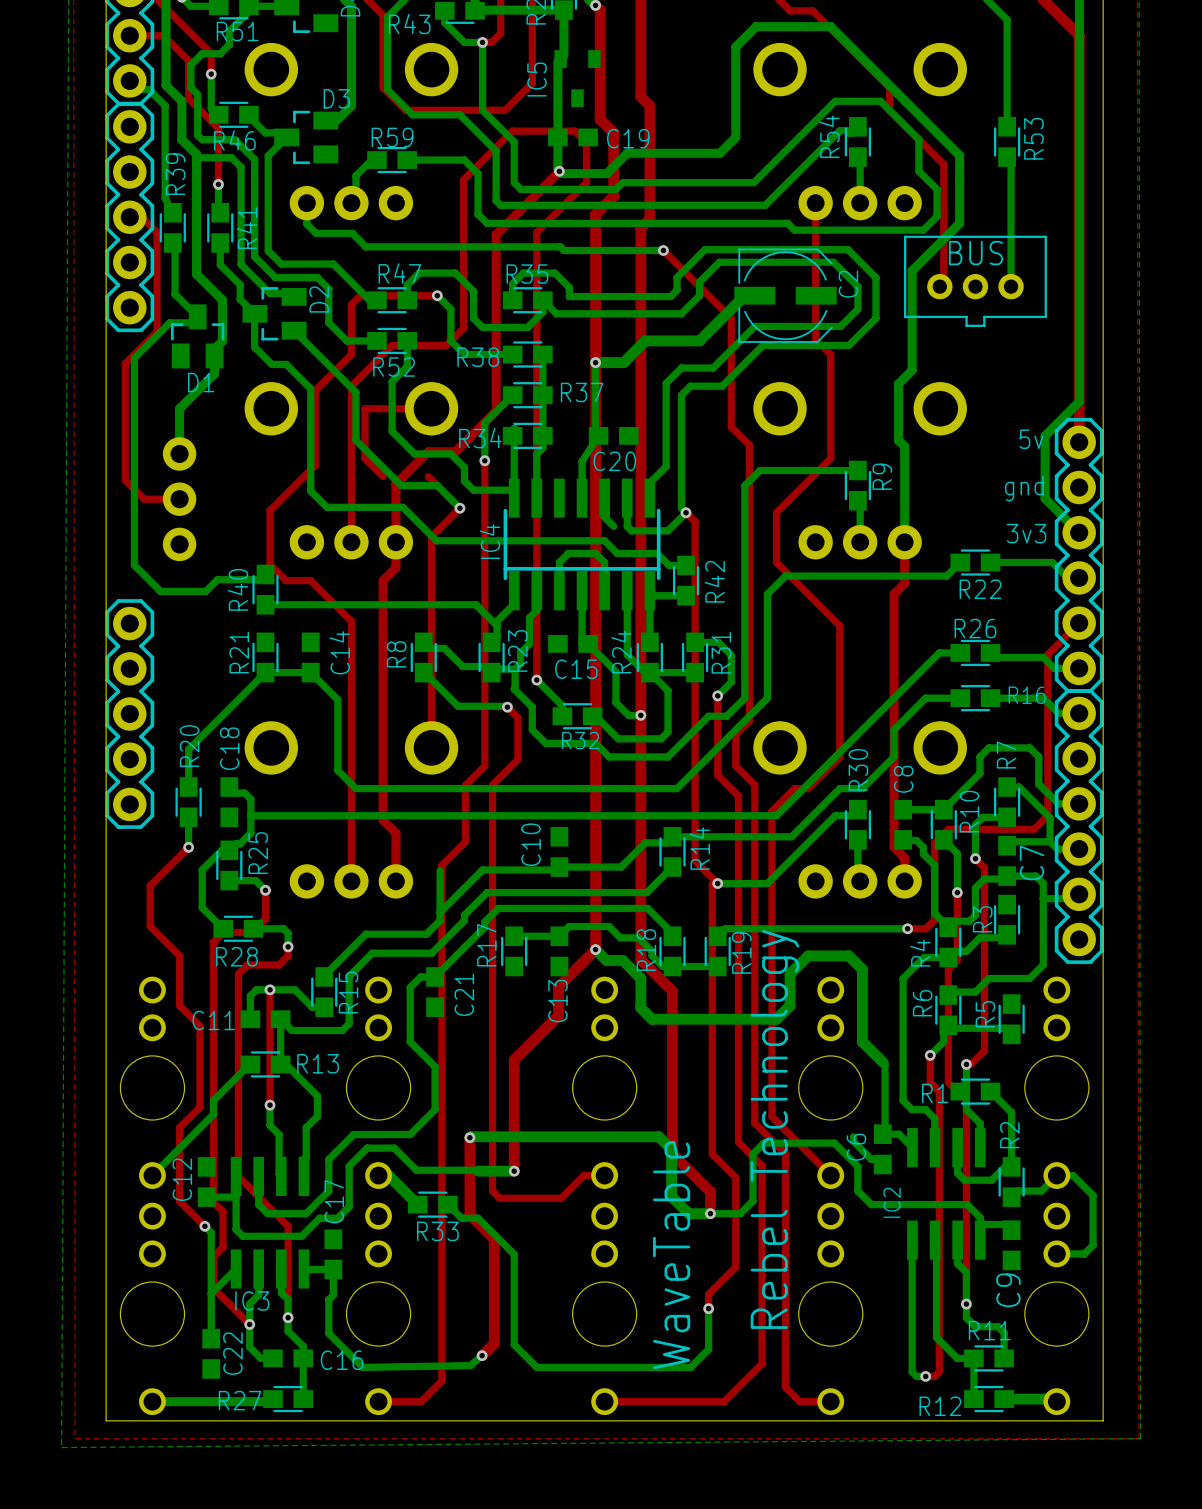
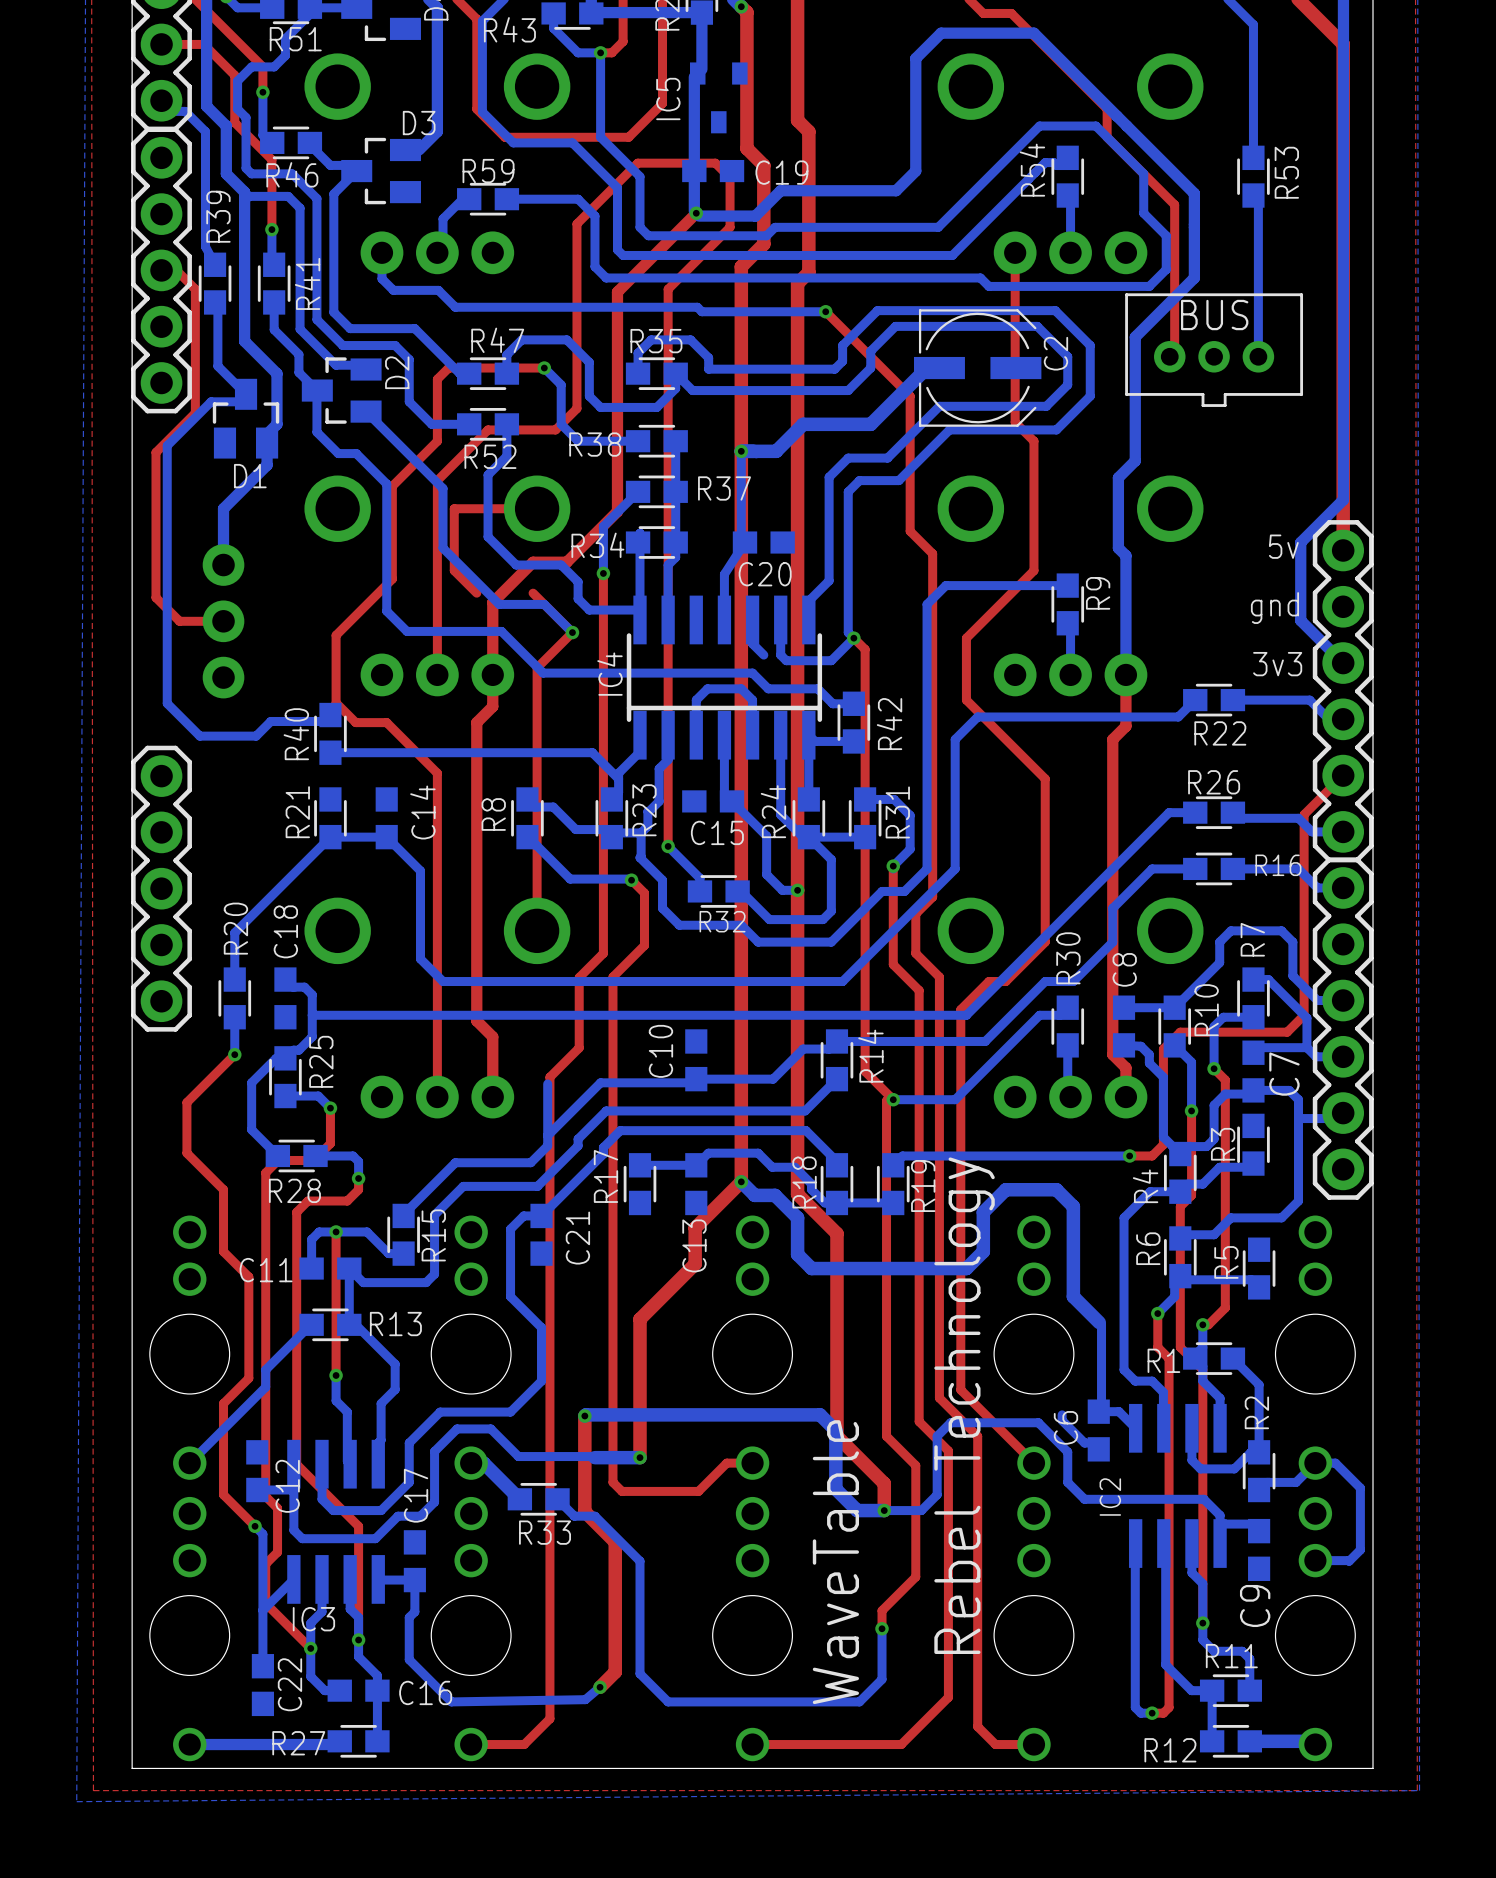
C12 name position: C12 (182, 1179) -> C12 (287, 1486)

